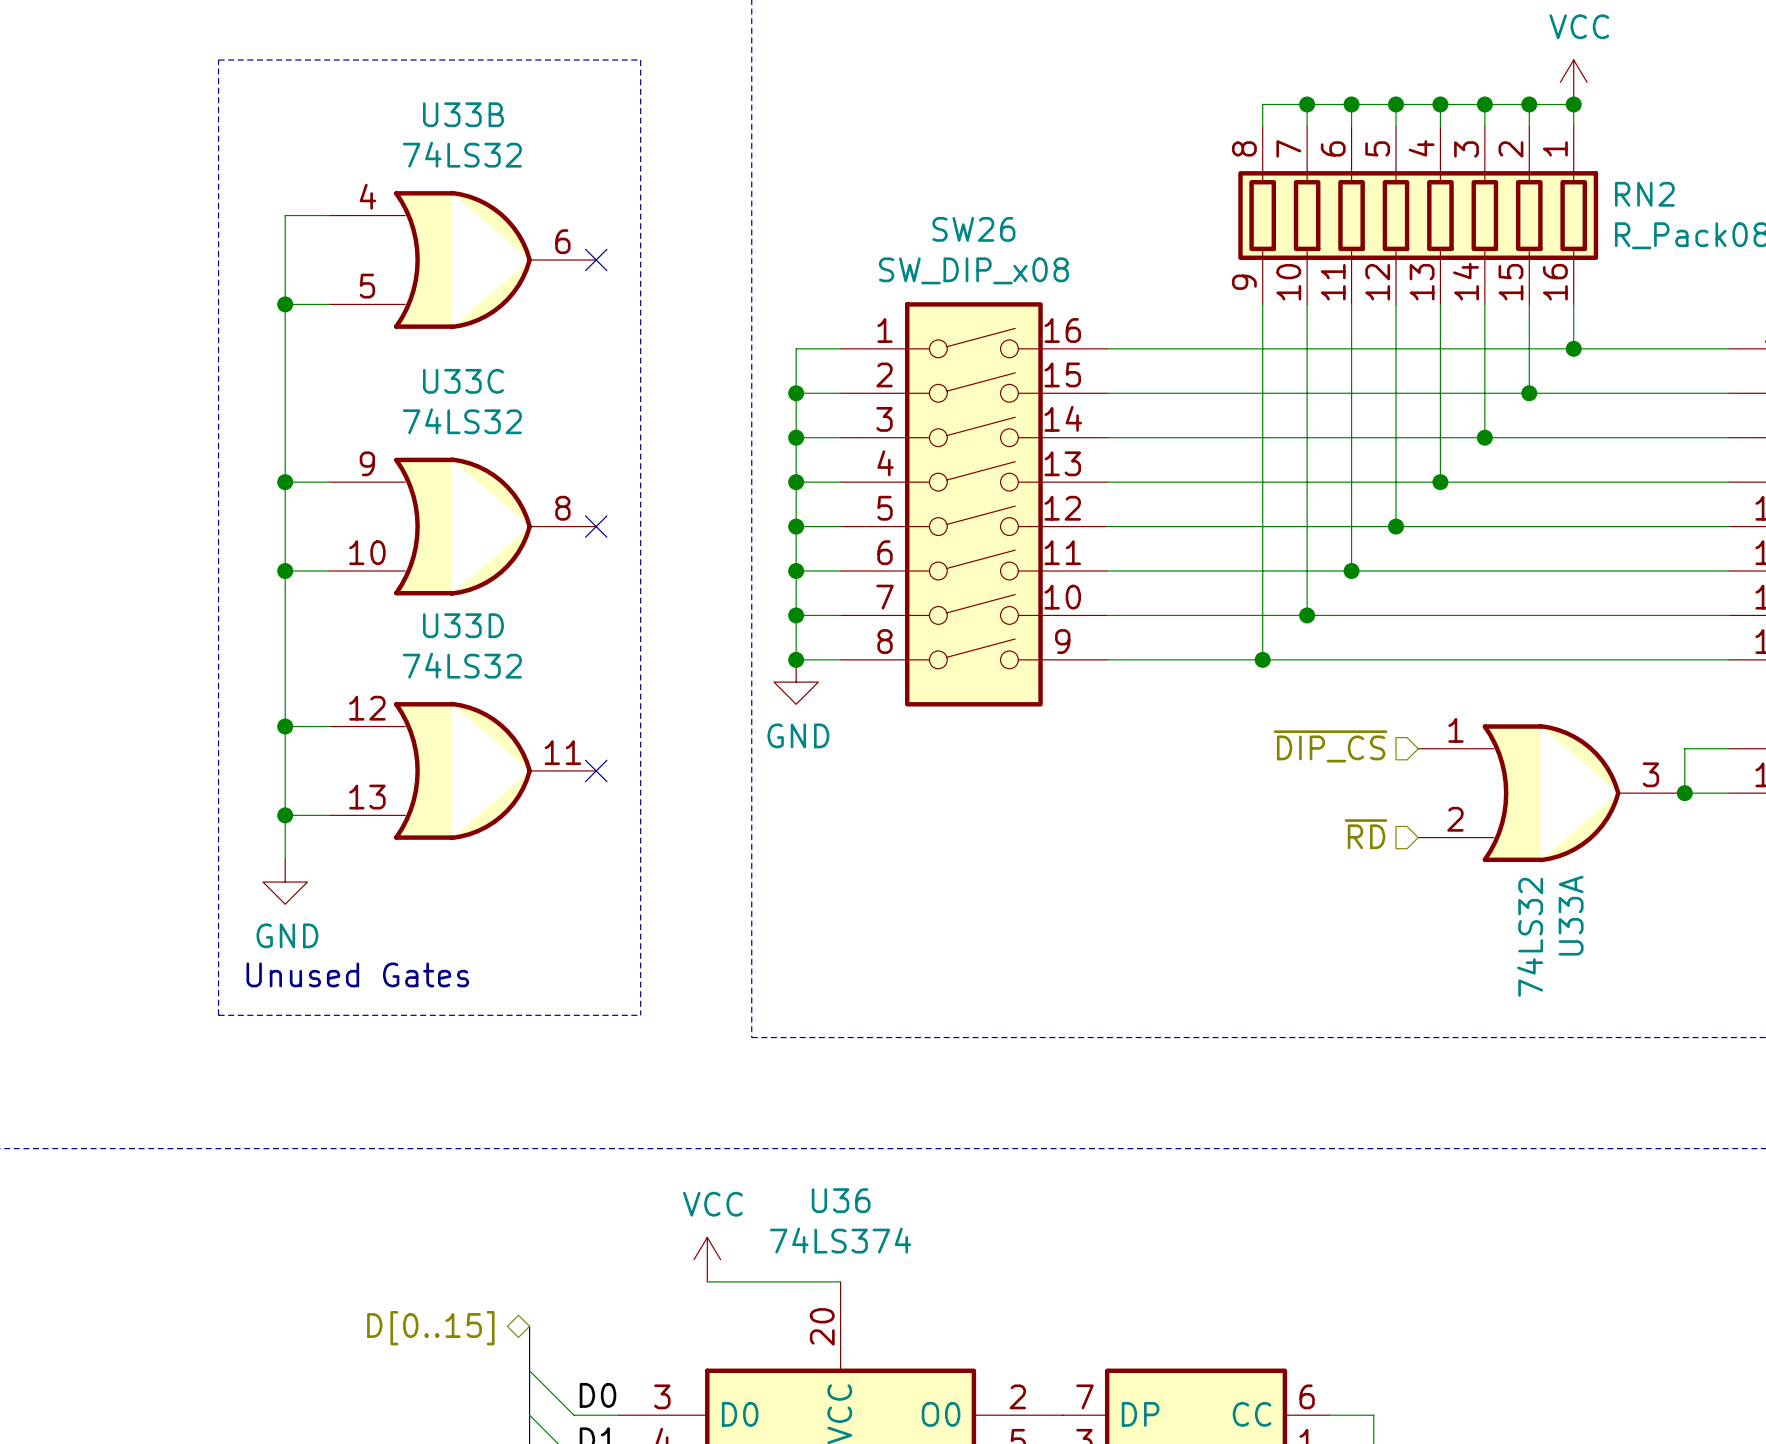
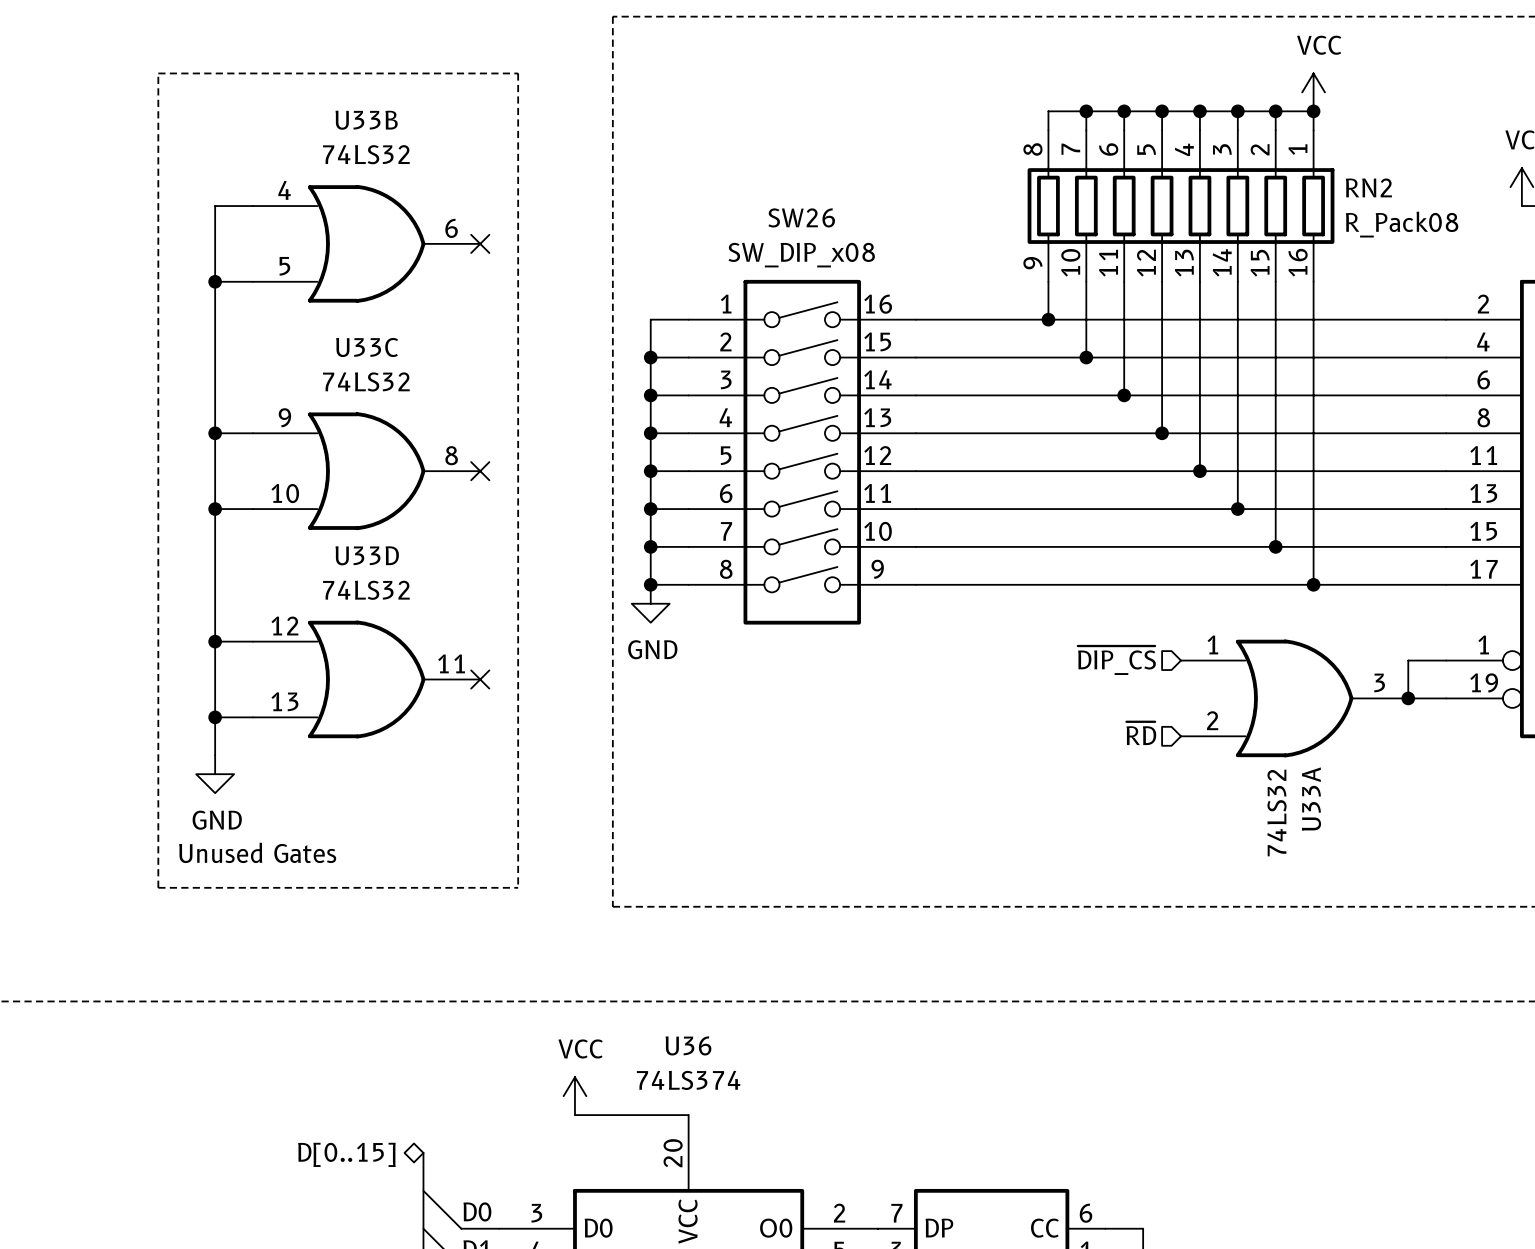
wire: (1262, 348) (1262, 659) -> (1313, 319) (1313, 584)
junction: none -> (1048, 319)
junction: (1573, 348) -> none
wire: (1307, 393) (1307, 615) -> (1275, 357) (1275, 546)
junction: none -> (1086, 357)
junction: (1529, 393) -> none
wire: (1351, 437) (1351, 571) -> (1237, 395) (1237, 509)
junction: none -> (1124, 395)
junction: (1484, 437) -> none
wire: (1395, 482) (1395, 526) -> (1199, 433) (1199, 471)
junction: none -> (1162, 433)
junction: (1440, 482) -> none
junction: (1395, 526) -> none
junction: none -> (1199, 471)
junction: (1351, 571) -> none
junction: none -> (1237, 509)
junction: (1307, 615) -> none
junction: none -> (1275, 546)
junction: (1262, 659) -> none
junction: none -> (1313, 584)

